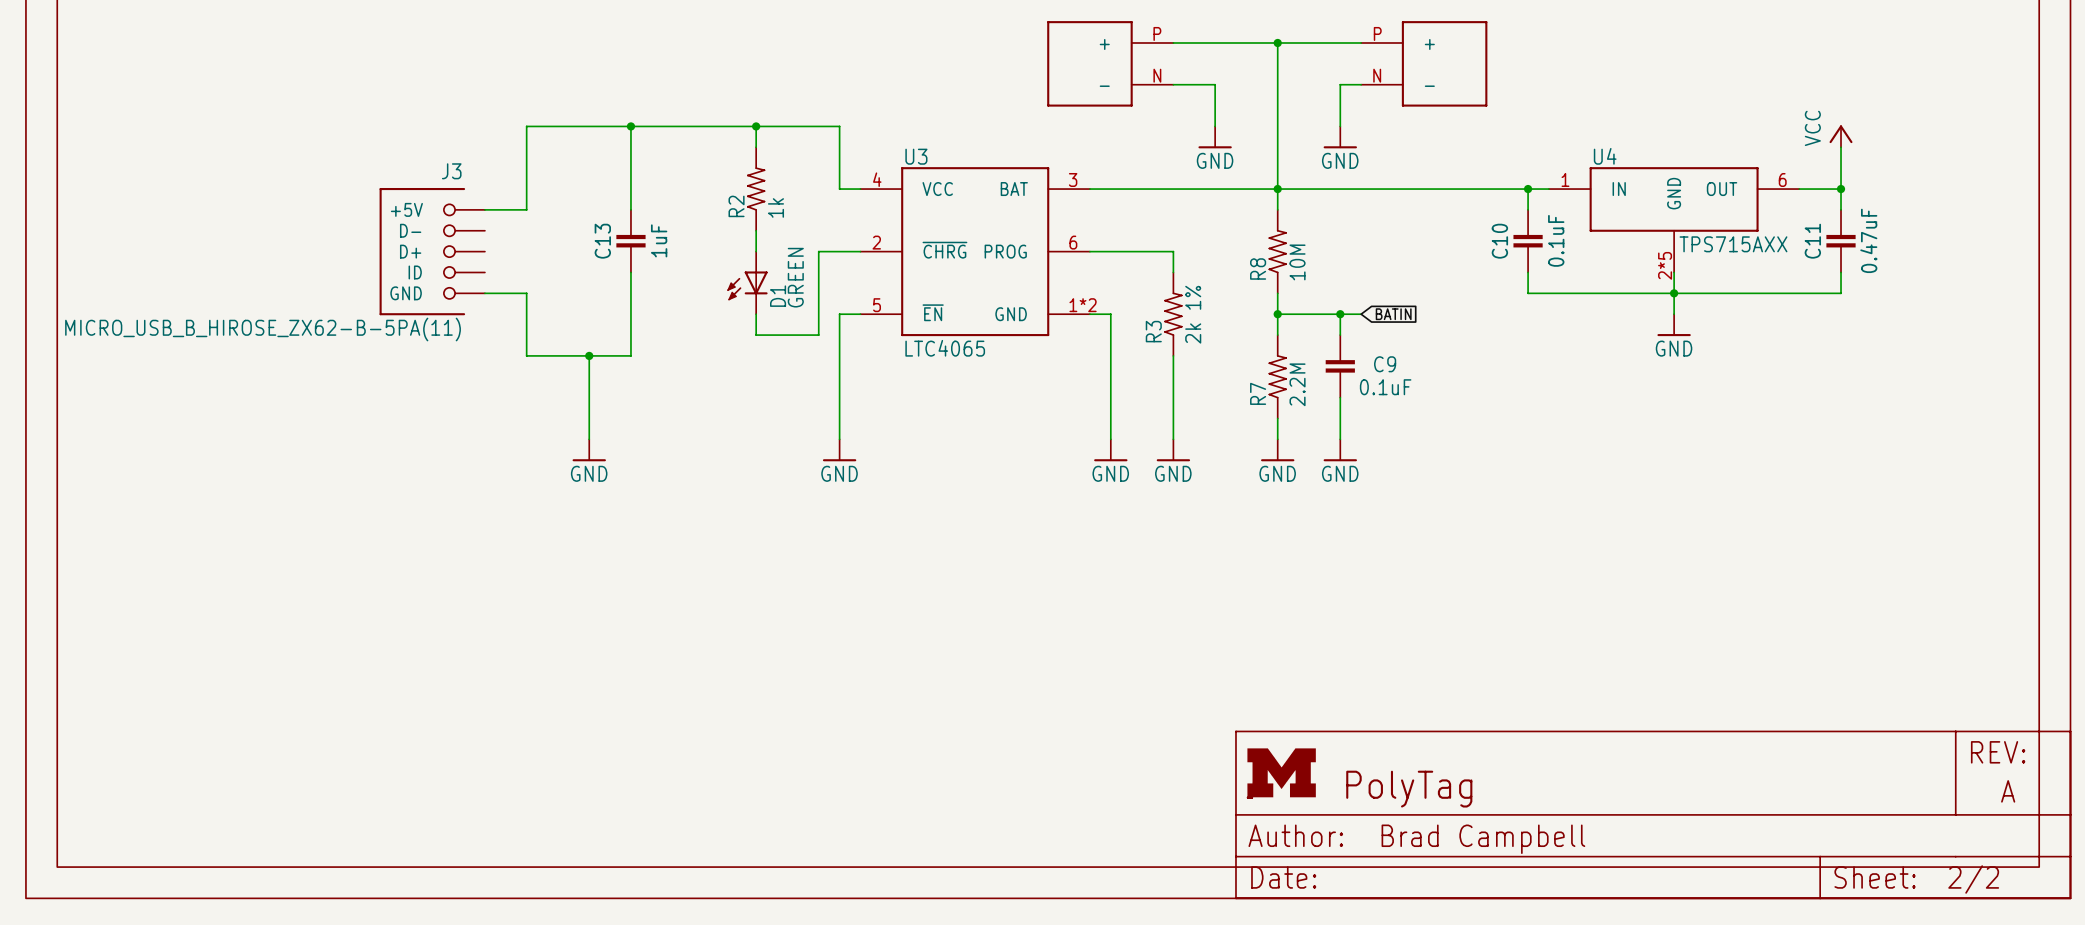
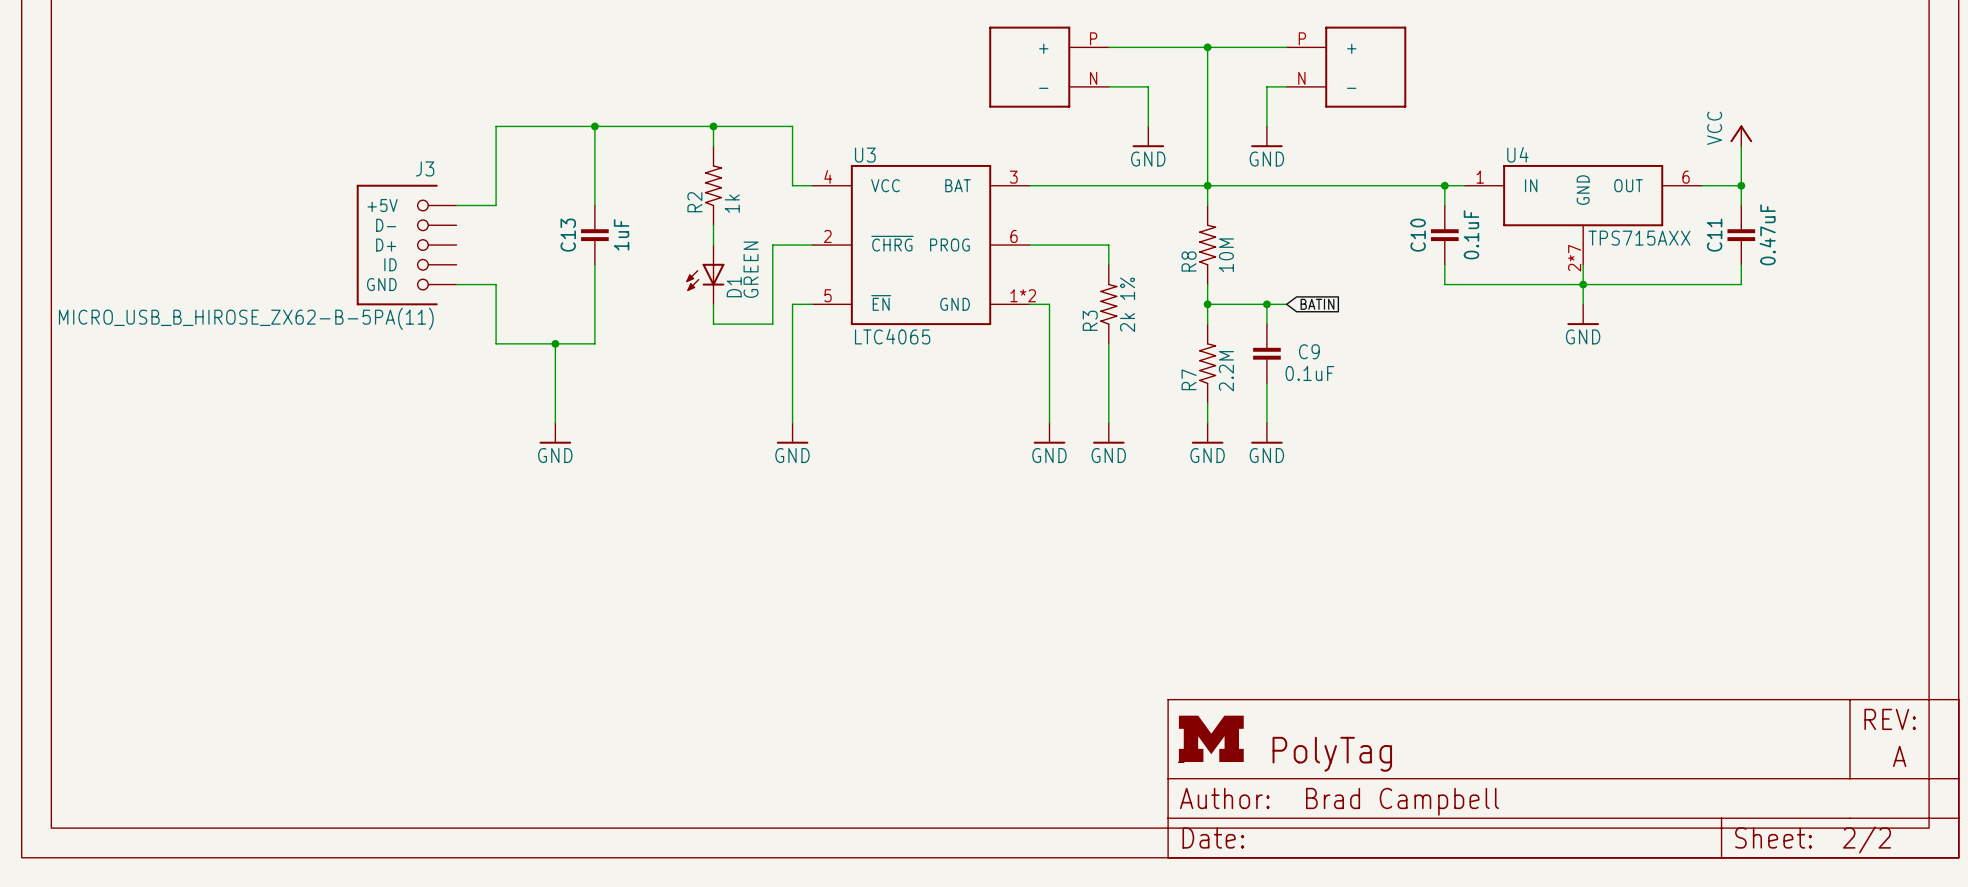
U4 pin number: 2*5 (1665, 265) -> 2*7 (1574, 258)

